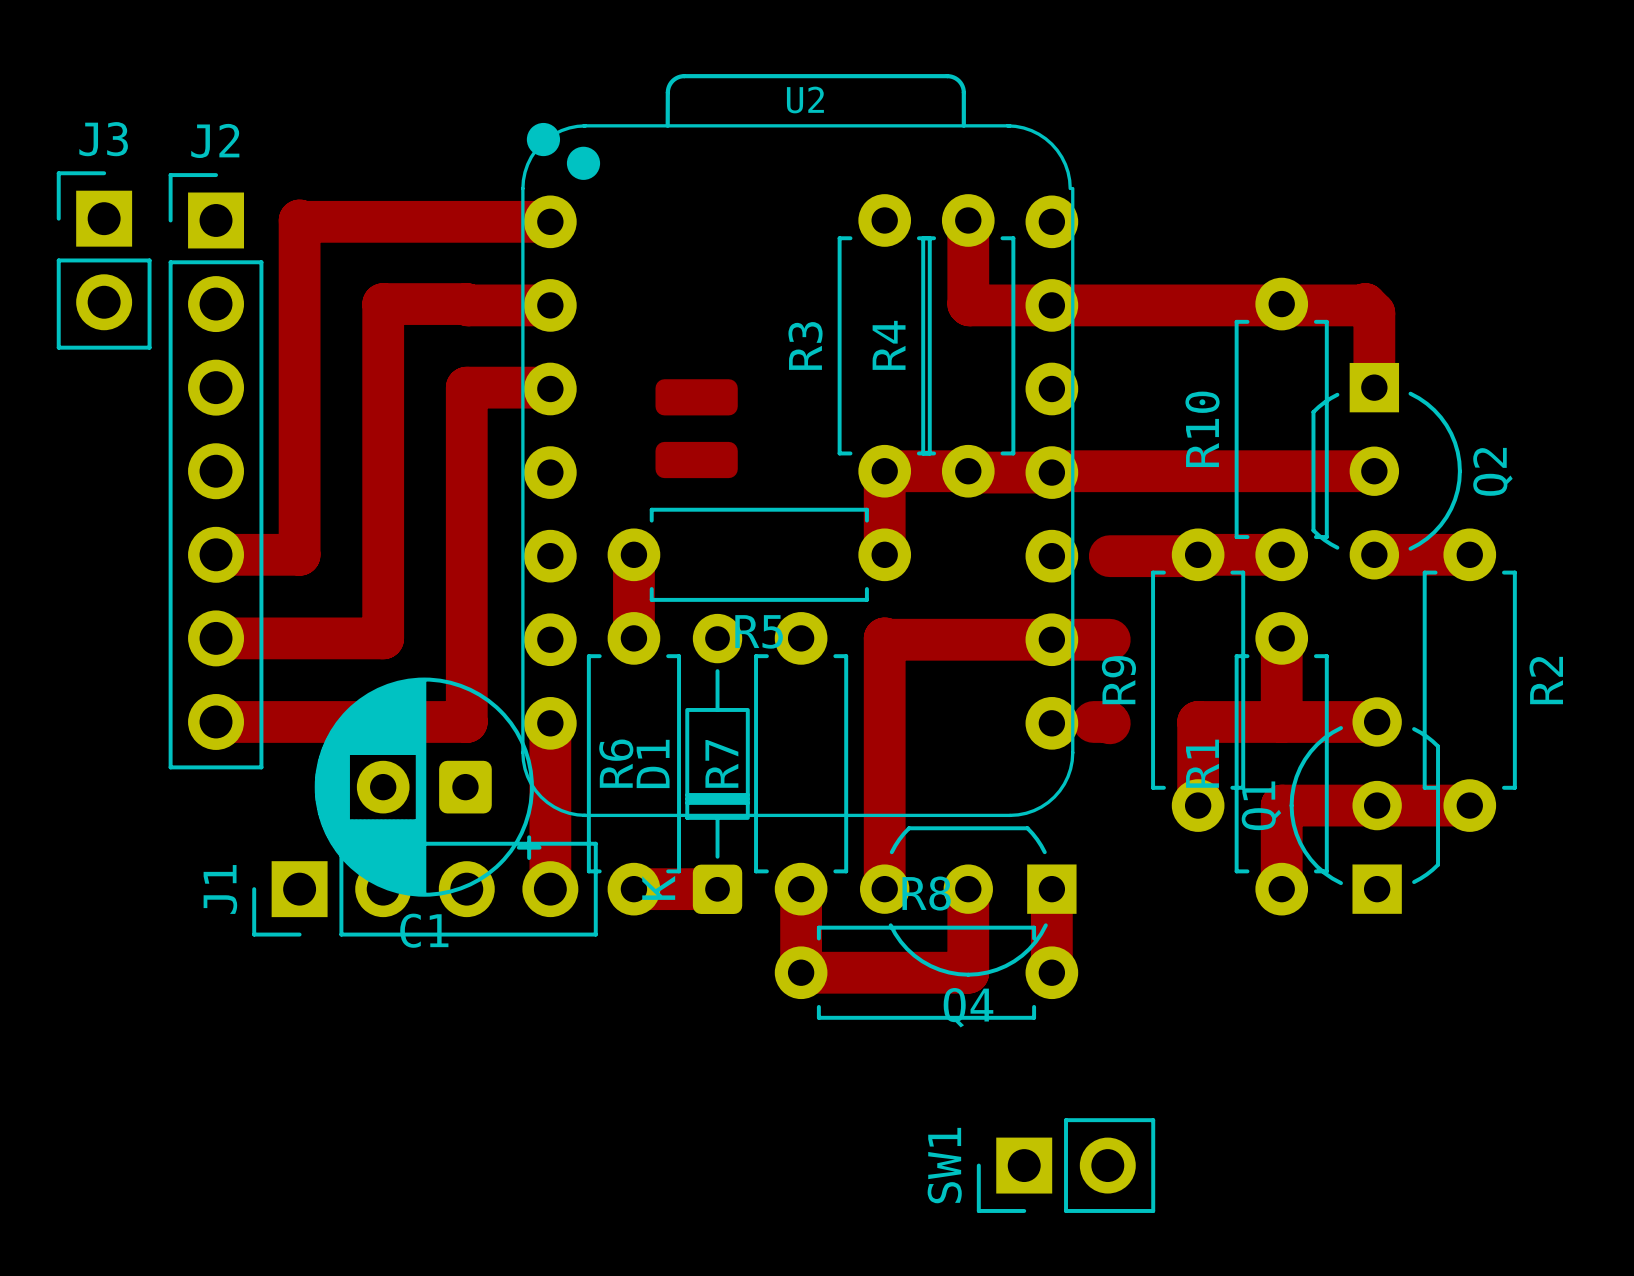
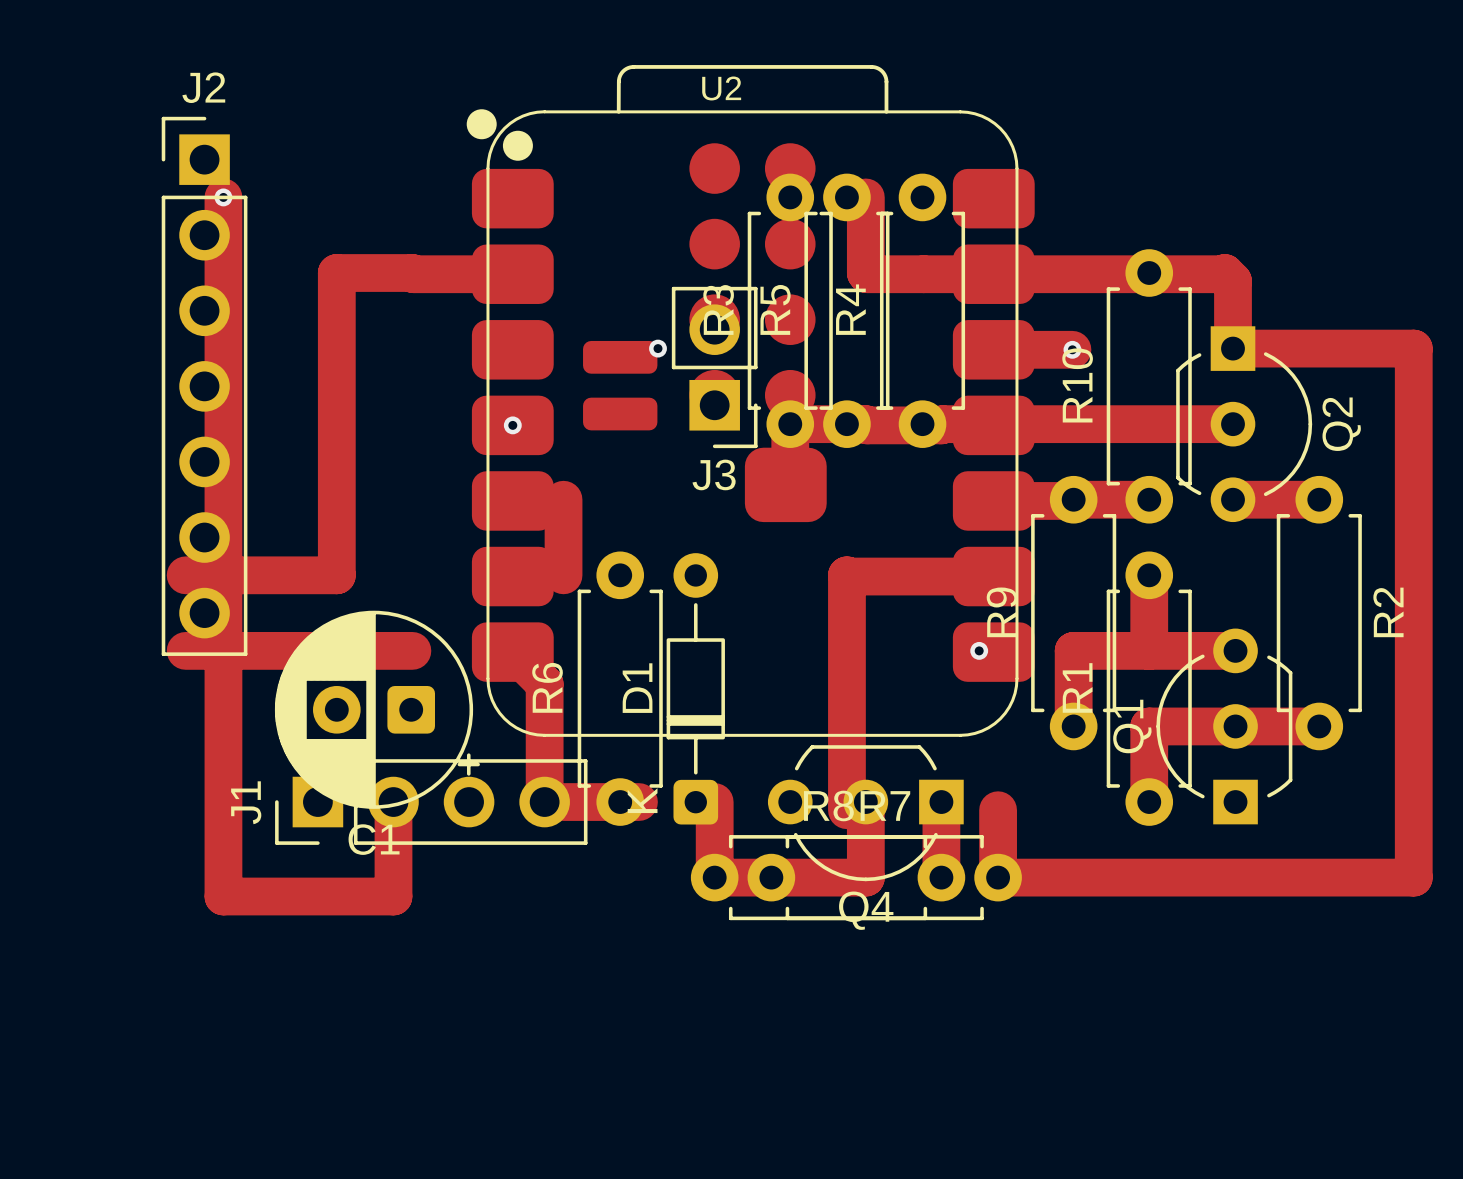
U2 footprint: [521, 74, 1079, 818] -> [466, 65, 1035, 737]
track: none -> (223, 197) (223, 896) (393, 896) (393, 802)
via: none -> (223, 197)
track: (550, 221) (299, 220) (299, 554) (216, 554) -> none
J3 rotation: 0° (104, 260) -> 180° (714, 367)
J3 position: (104, 260) -> (714, 367)
R4 position: (968, 345) -> (922, 310)
via: none -> (658, 348)
track: none -> (1233, 348) (1413, 348) (1413, 877) (998, 877) (998, 810)
track: (550, 388) (466, 387) (466, 721) -> none
track: none -> (993, 349) (1072, 349)
via: none -> (1072, 349)
J2 position: (216, 471) -> (204, 386)
via: none -> (512, 425)
R5 rotation: 0° (759, 554) -> 90° clockwise (846, 310)
R5 position: (759, 554) -> (846, 310)
track: (948, 639) (884, 638) (884, 889) -> (848, 576) (846, 575) (846, 810)
via: none -> (979, 650)
track: (550, 723) (550, 889) -> none
track: none -> (512, 652) (544, 683) (544, 802)
R6 position: (633, 763) -> (620, 688)
D1 position: (717, 763) -> (695, 688)
R7 rotation: 0° (801, 763) -> 90° clockwise (884, 877)
R7 position: (801, 763) -> (884, 877)
J1 position: (424, 889) -> (431, 802)
SW1: (1066, 1165) -> none

